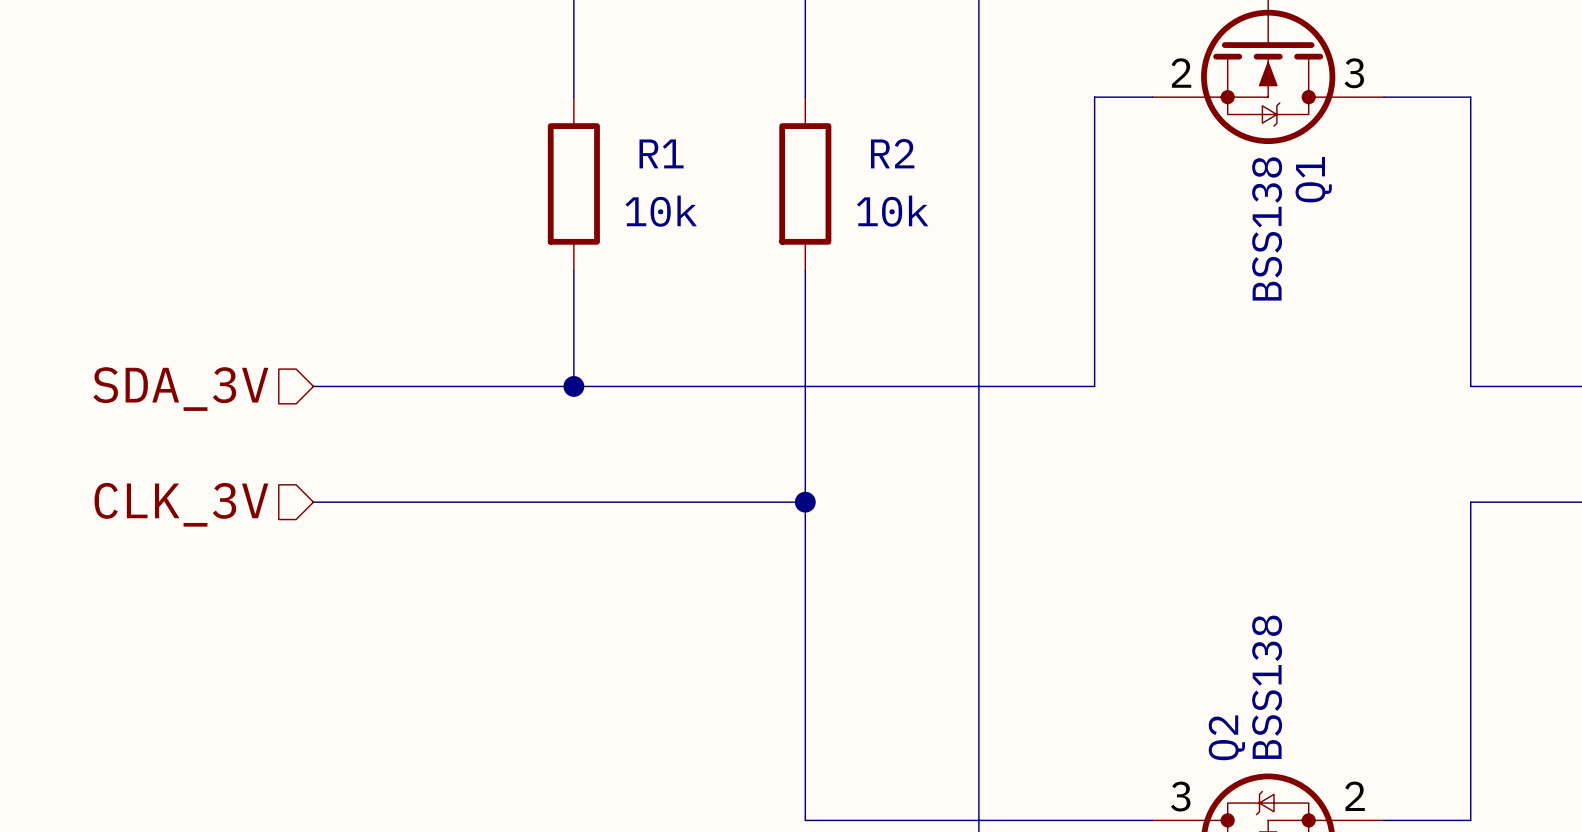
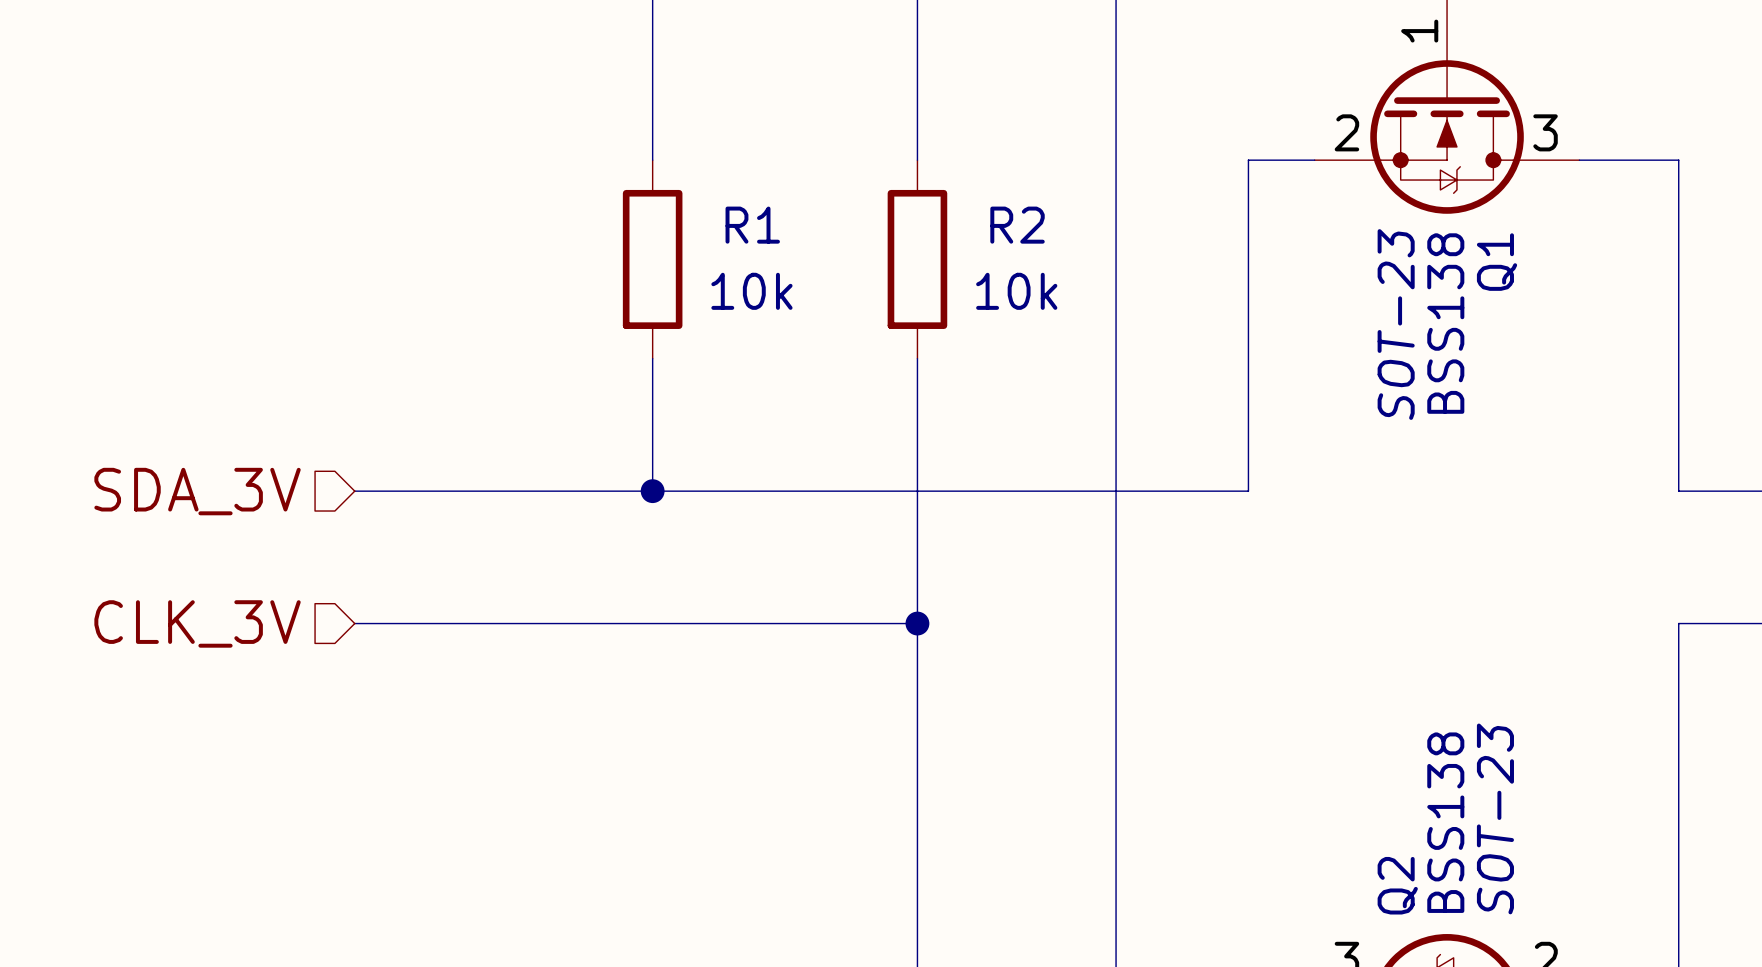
Q1 text: none -> SOT-23 (1396, 324)
Q2 text: none -> SOT-23 (1495, 818)

